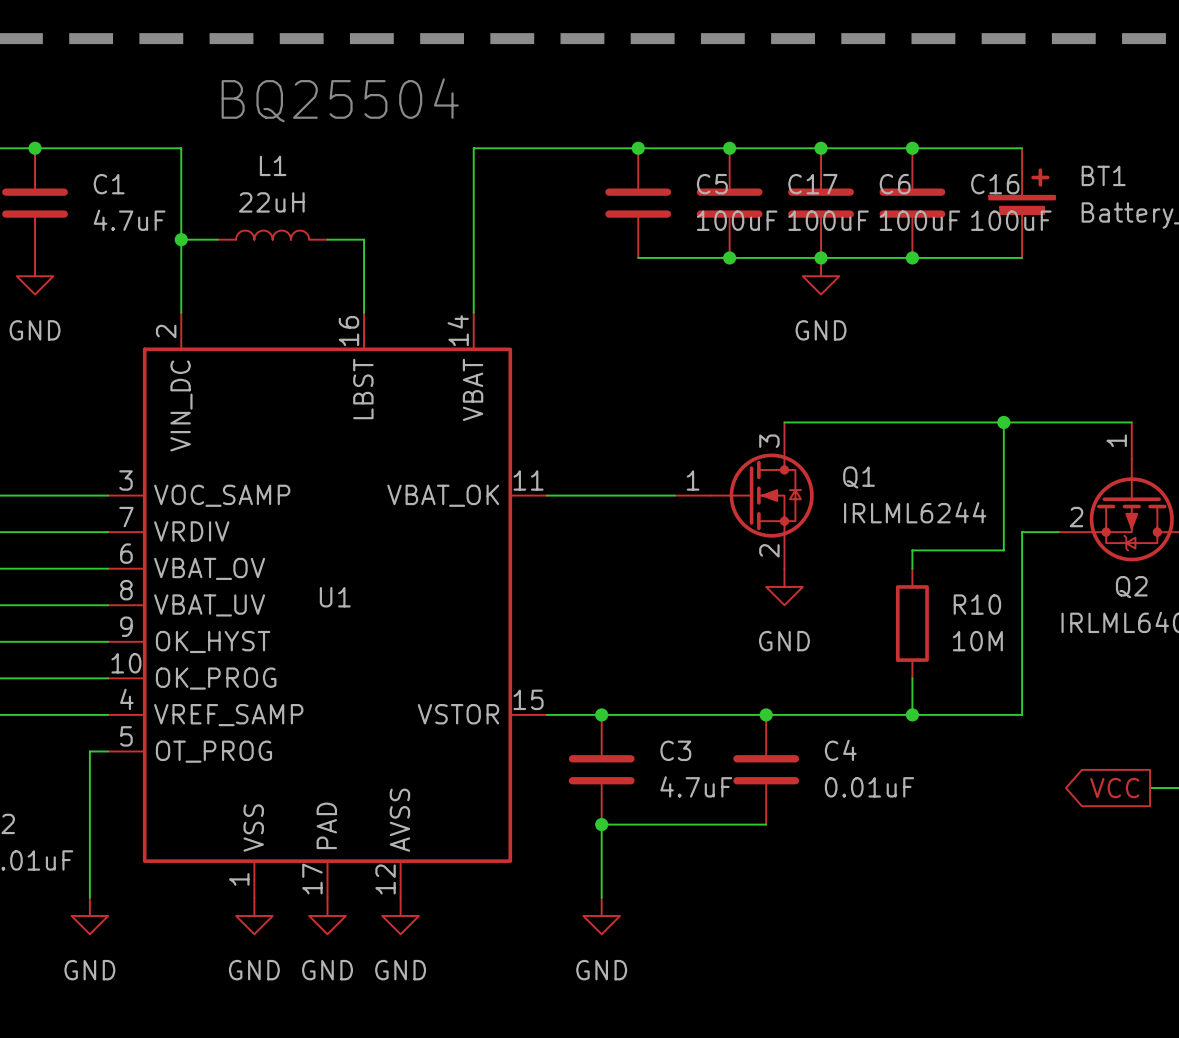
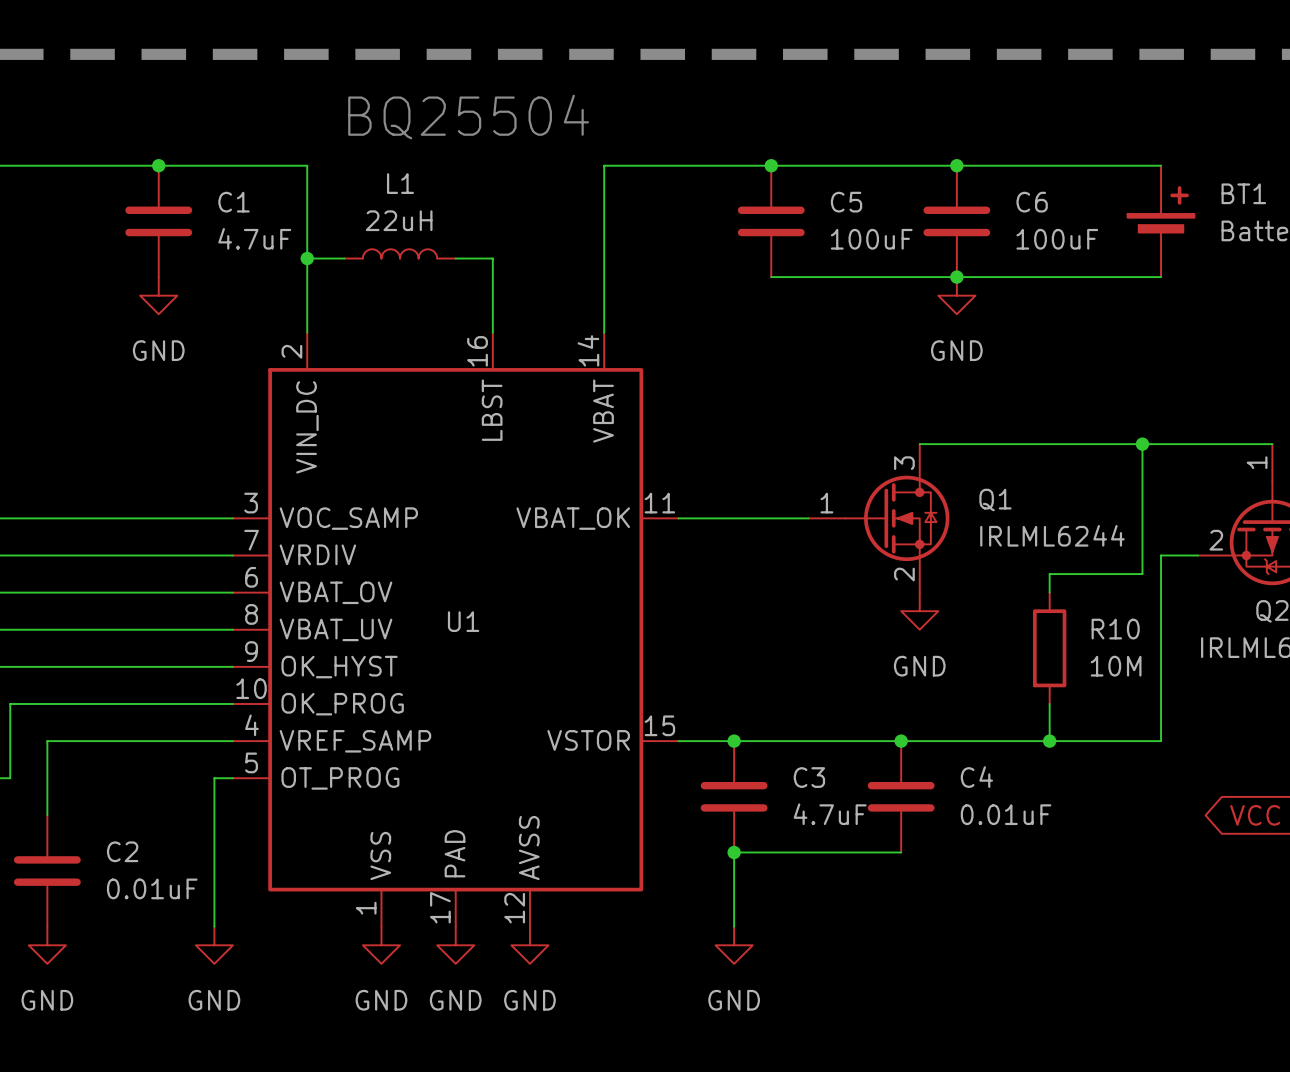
junction: (729, 148) -> none
junction: (912, 148) -> none
C17: 100uF (729, 203) -> none
C16: 100uF (912, 203) -> none
junction: (729, 257) -> none
junction: (912, 257) -> none

